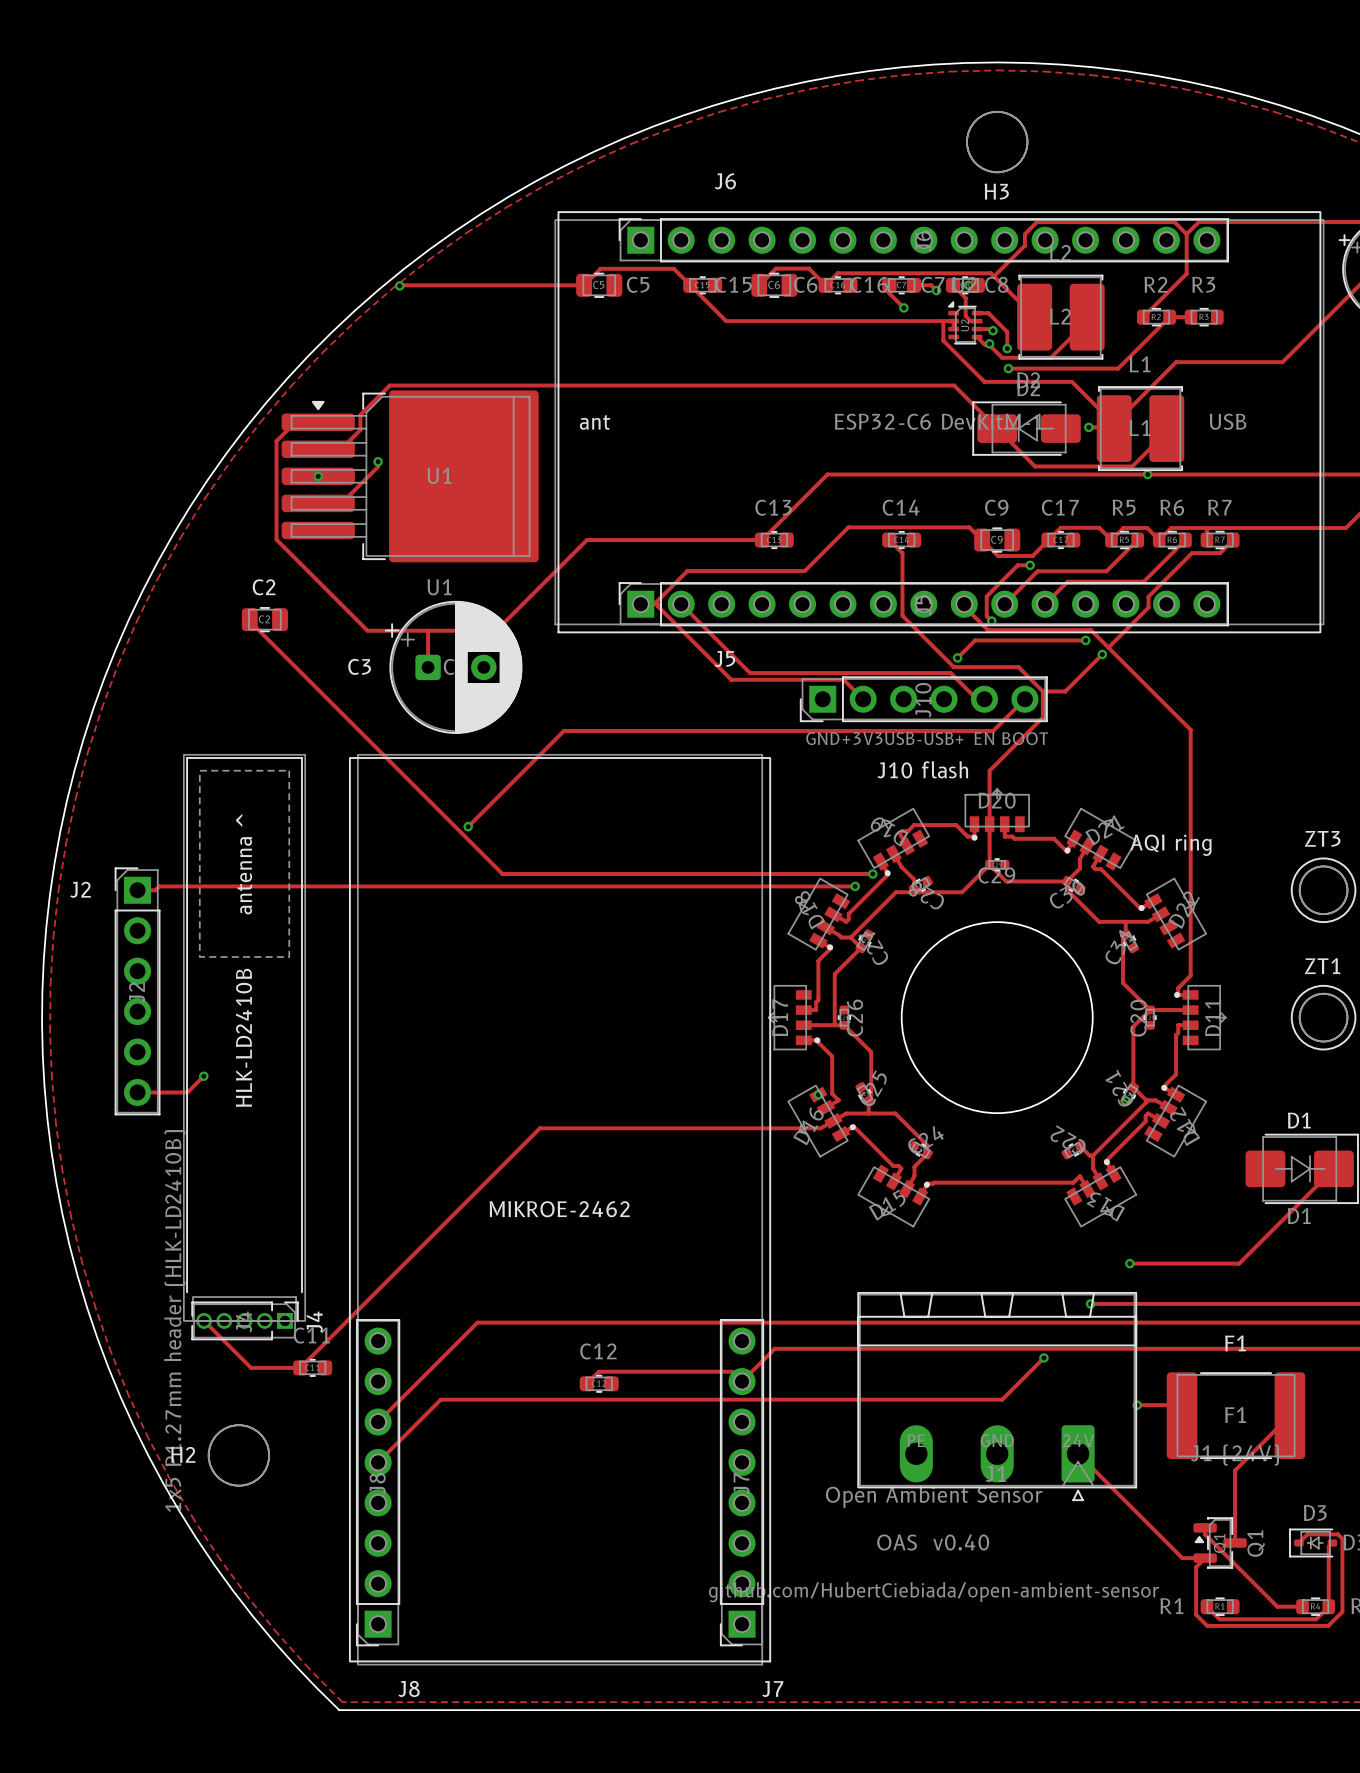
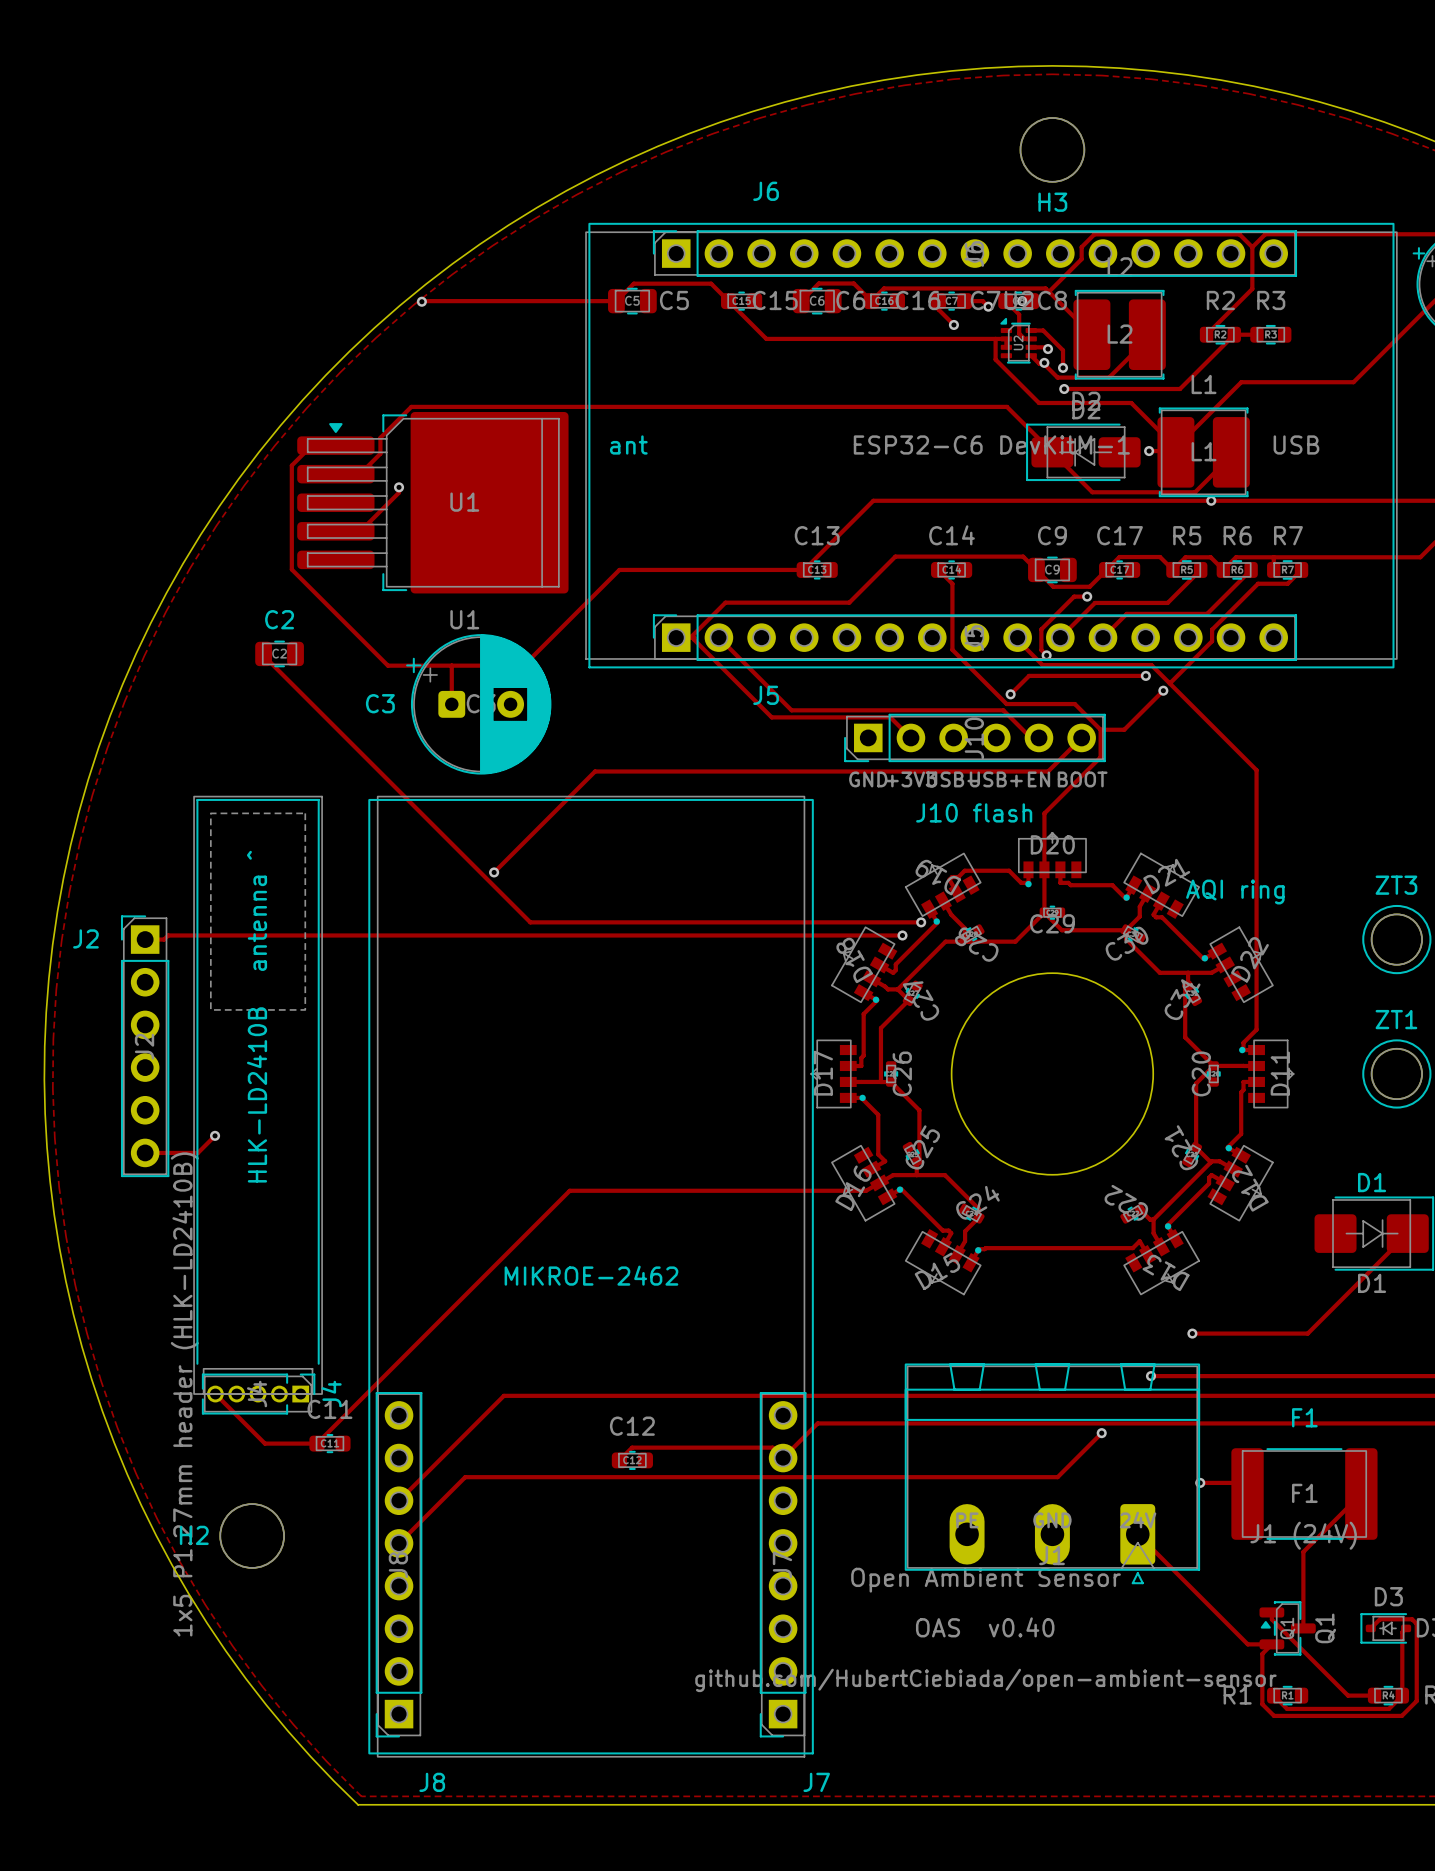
via: (318, 476) -> none
via: (818, 1094) -> none
via: (1125, 1100) -> none

